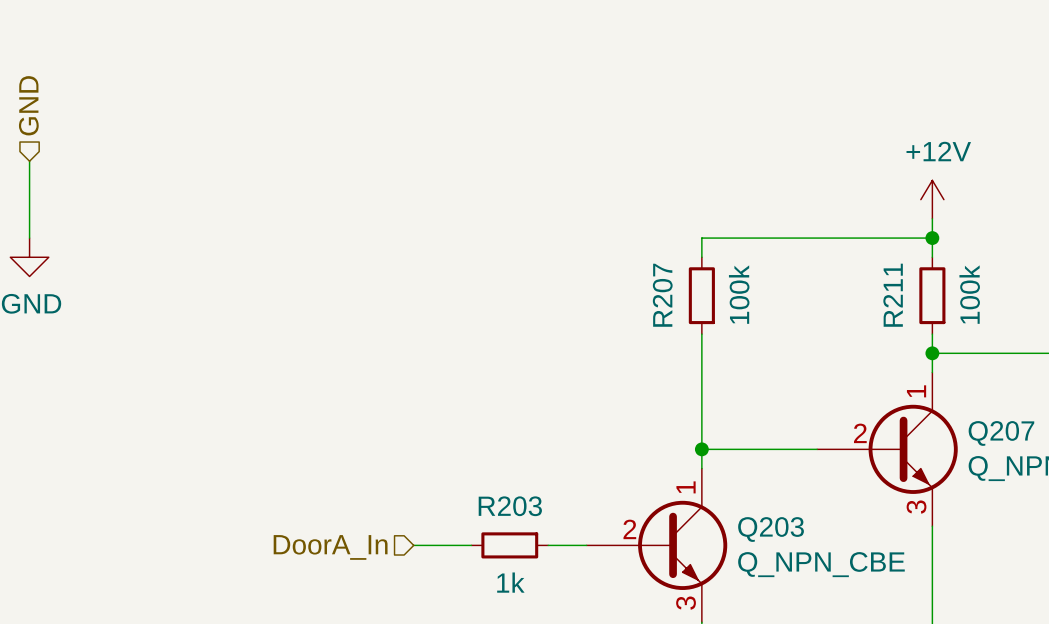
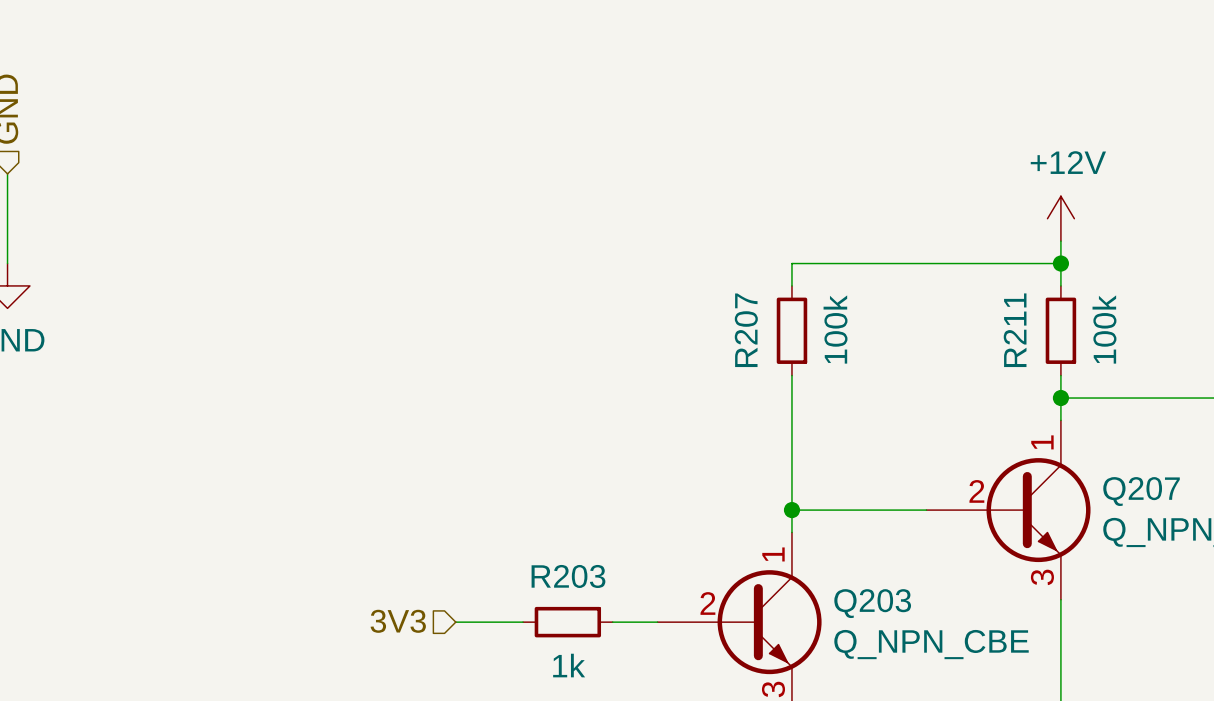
hierarchical label: DoorA_In (330, 547) -> 3V3 (398, 621)

